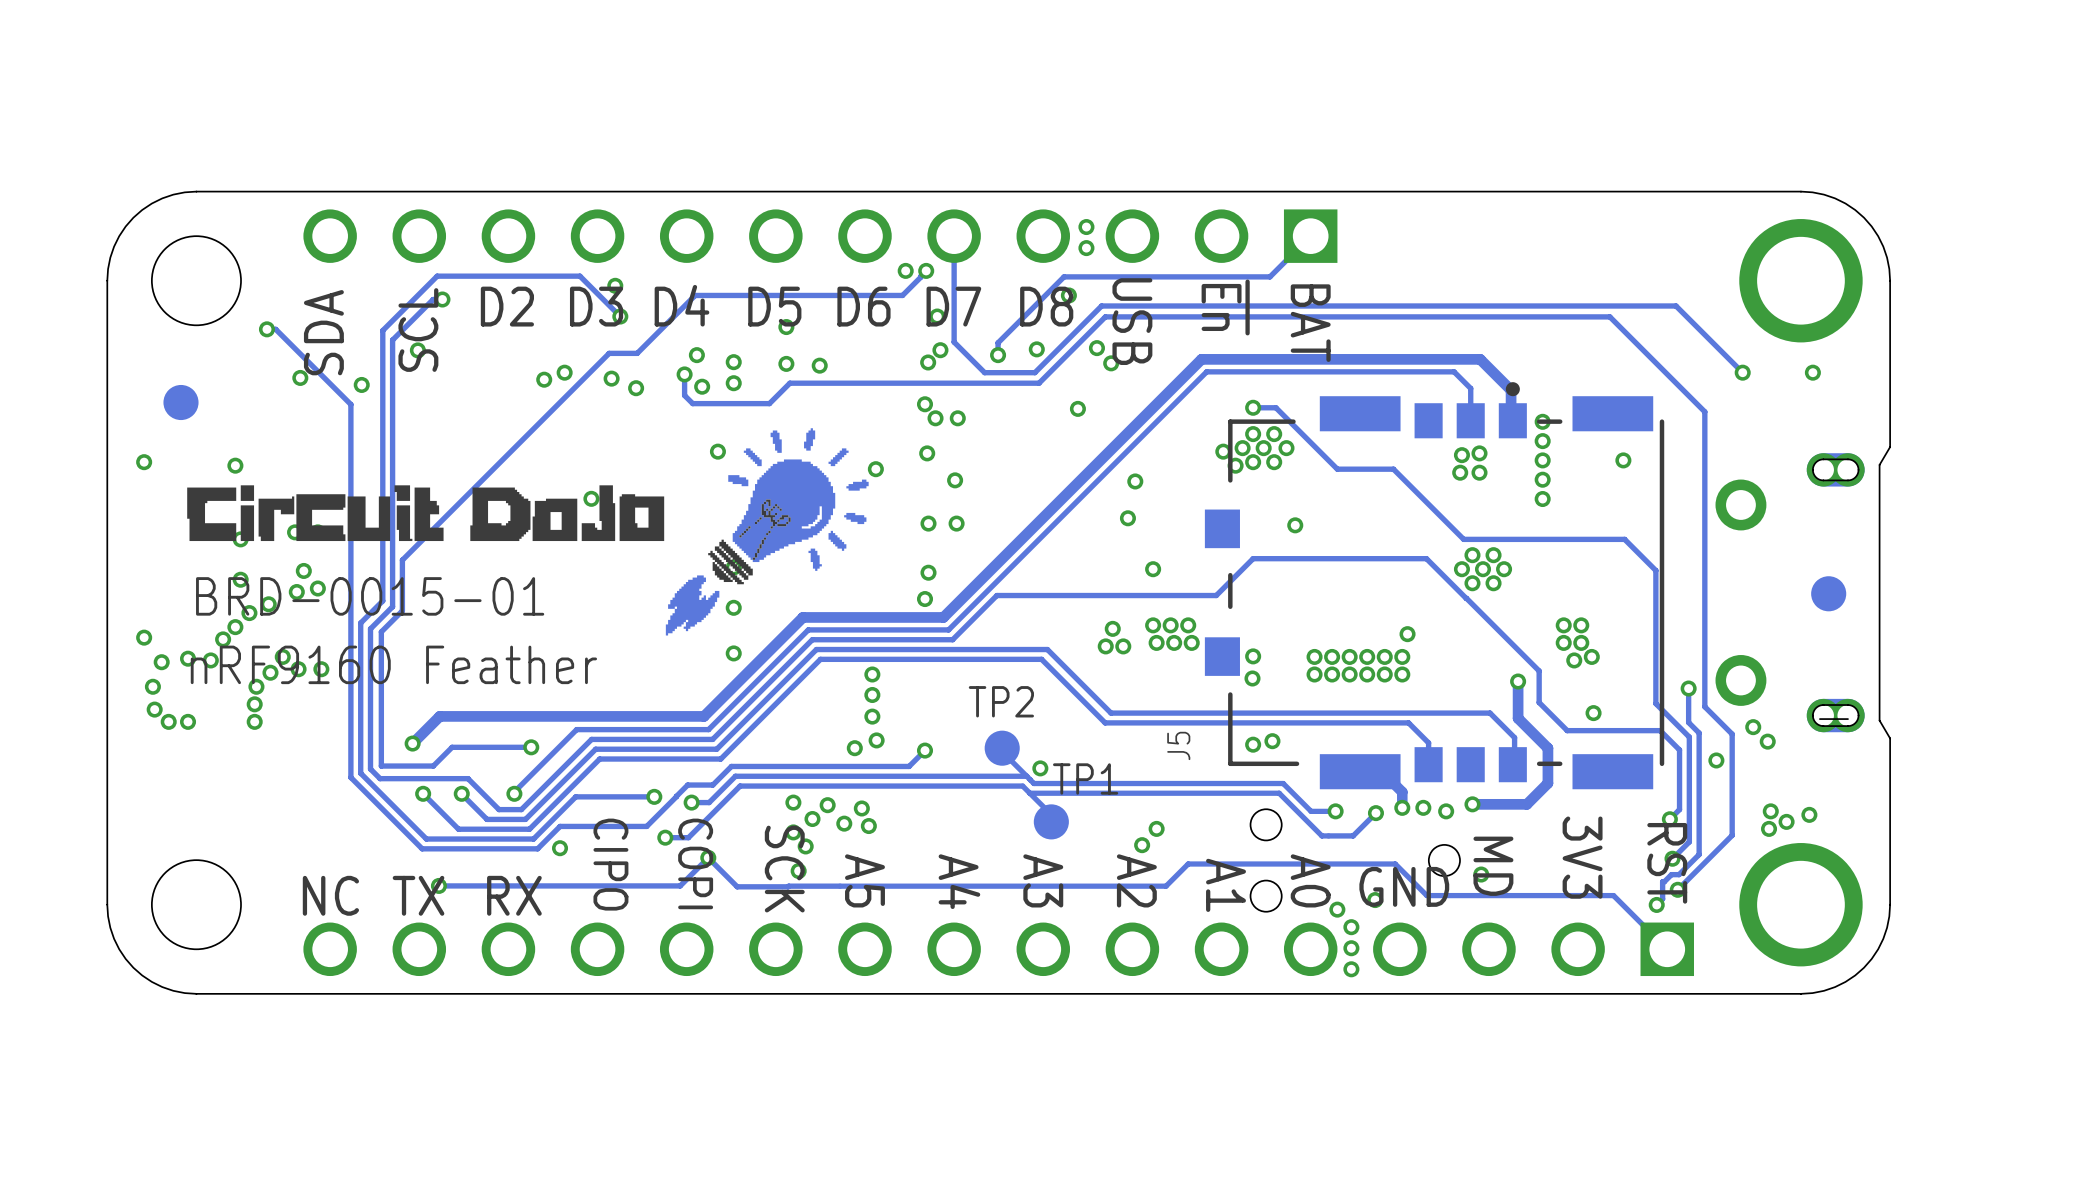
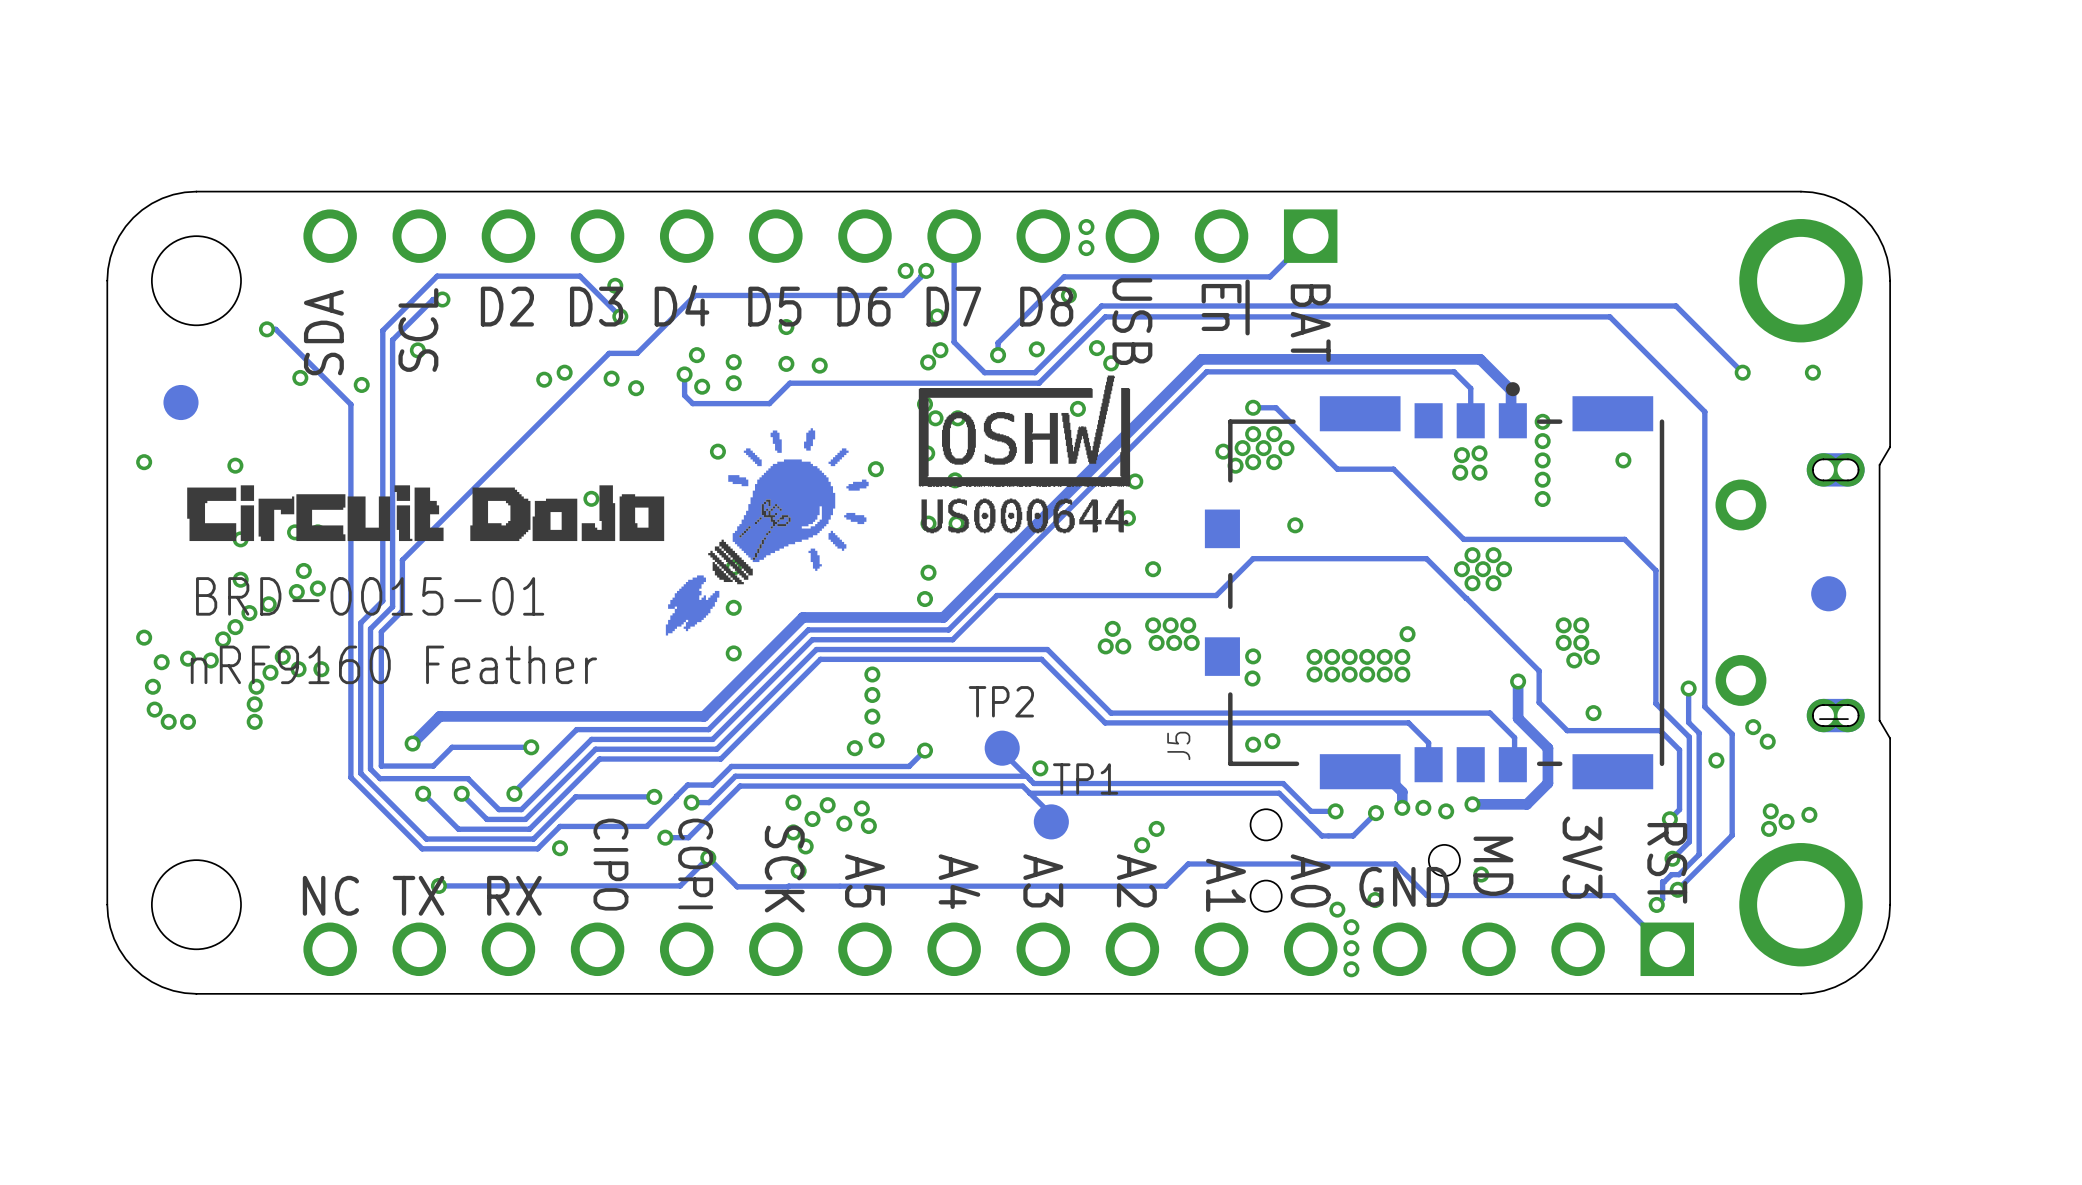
drawing: none -> [918, 375, 1131, 534]

